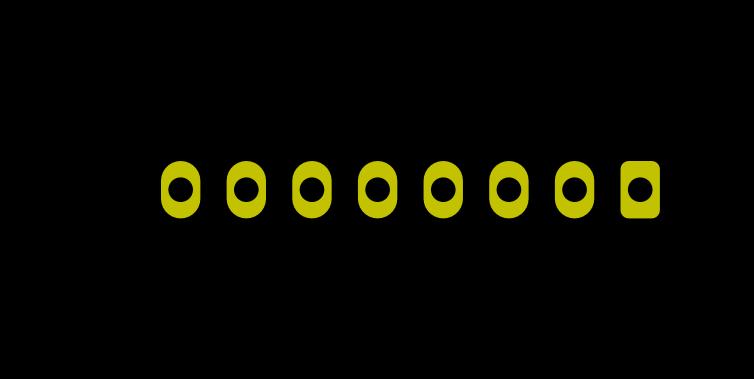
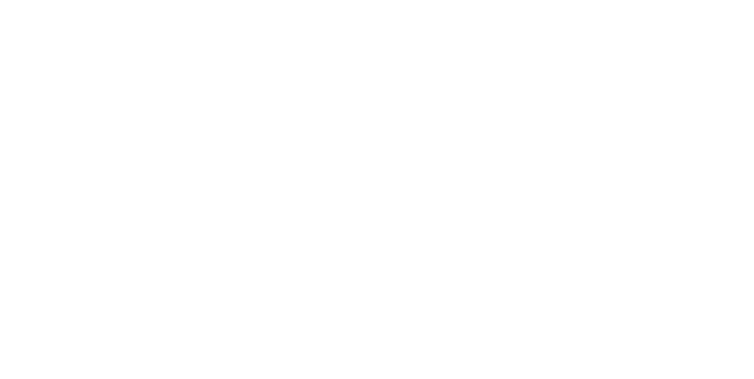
part: (410, 189) -> none

